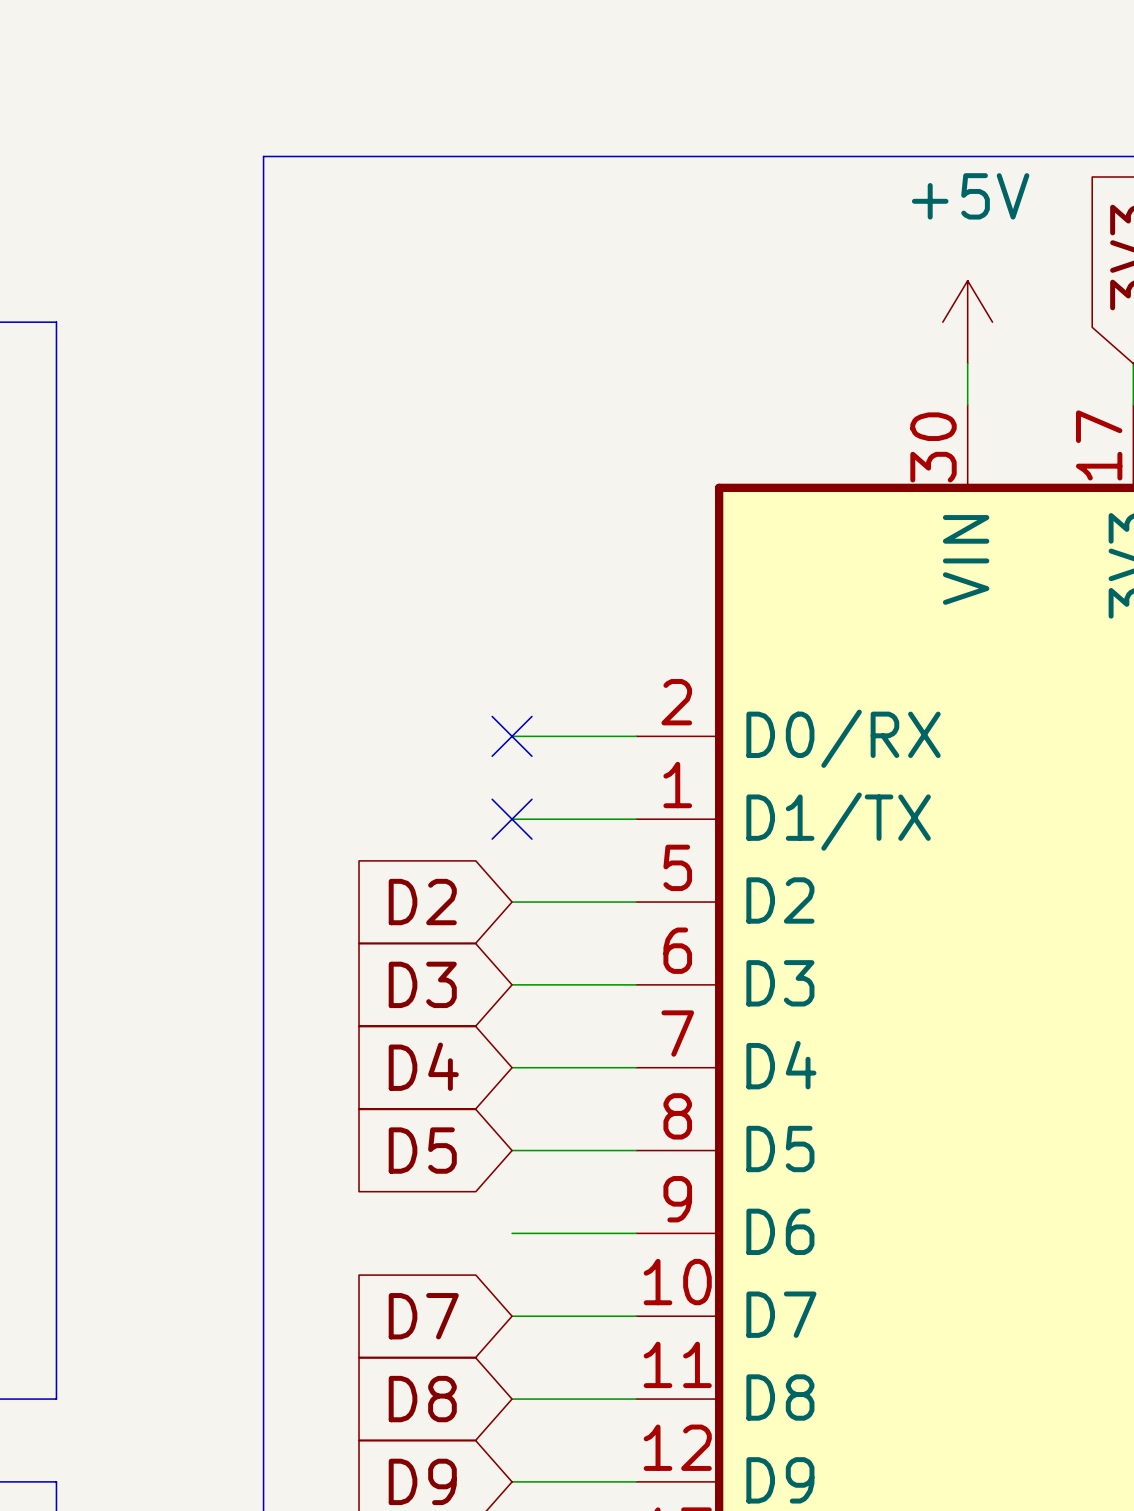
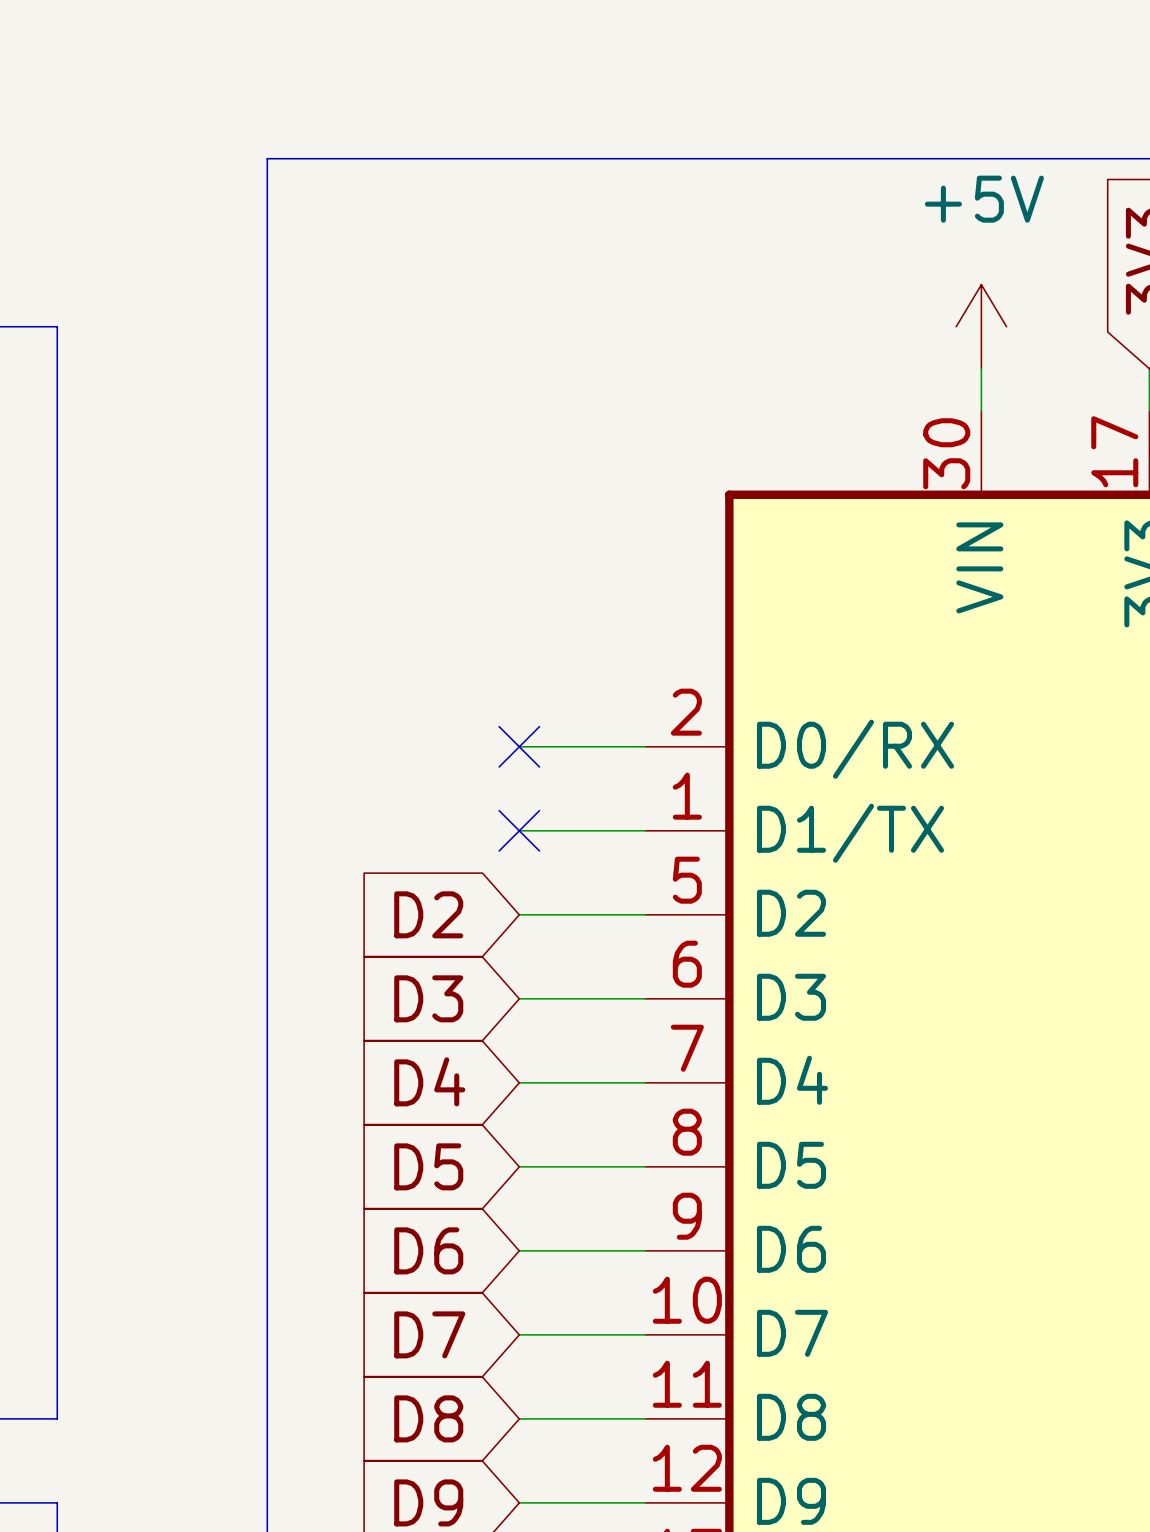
global label: none -> D6 (428, 1250)

